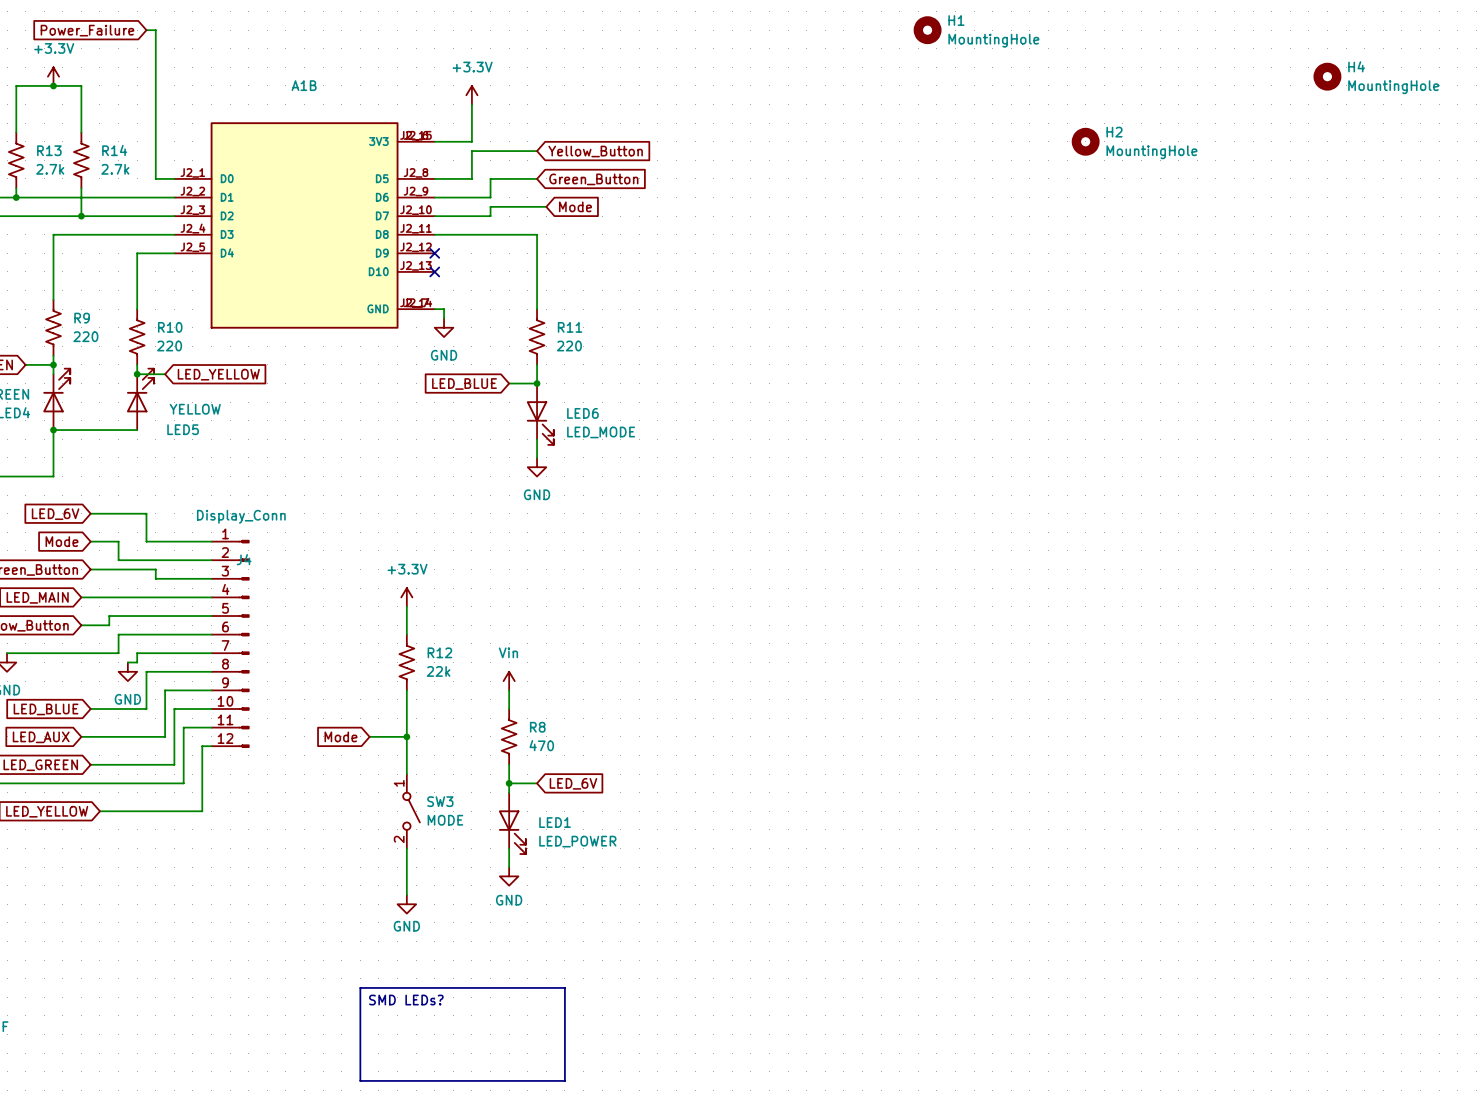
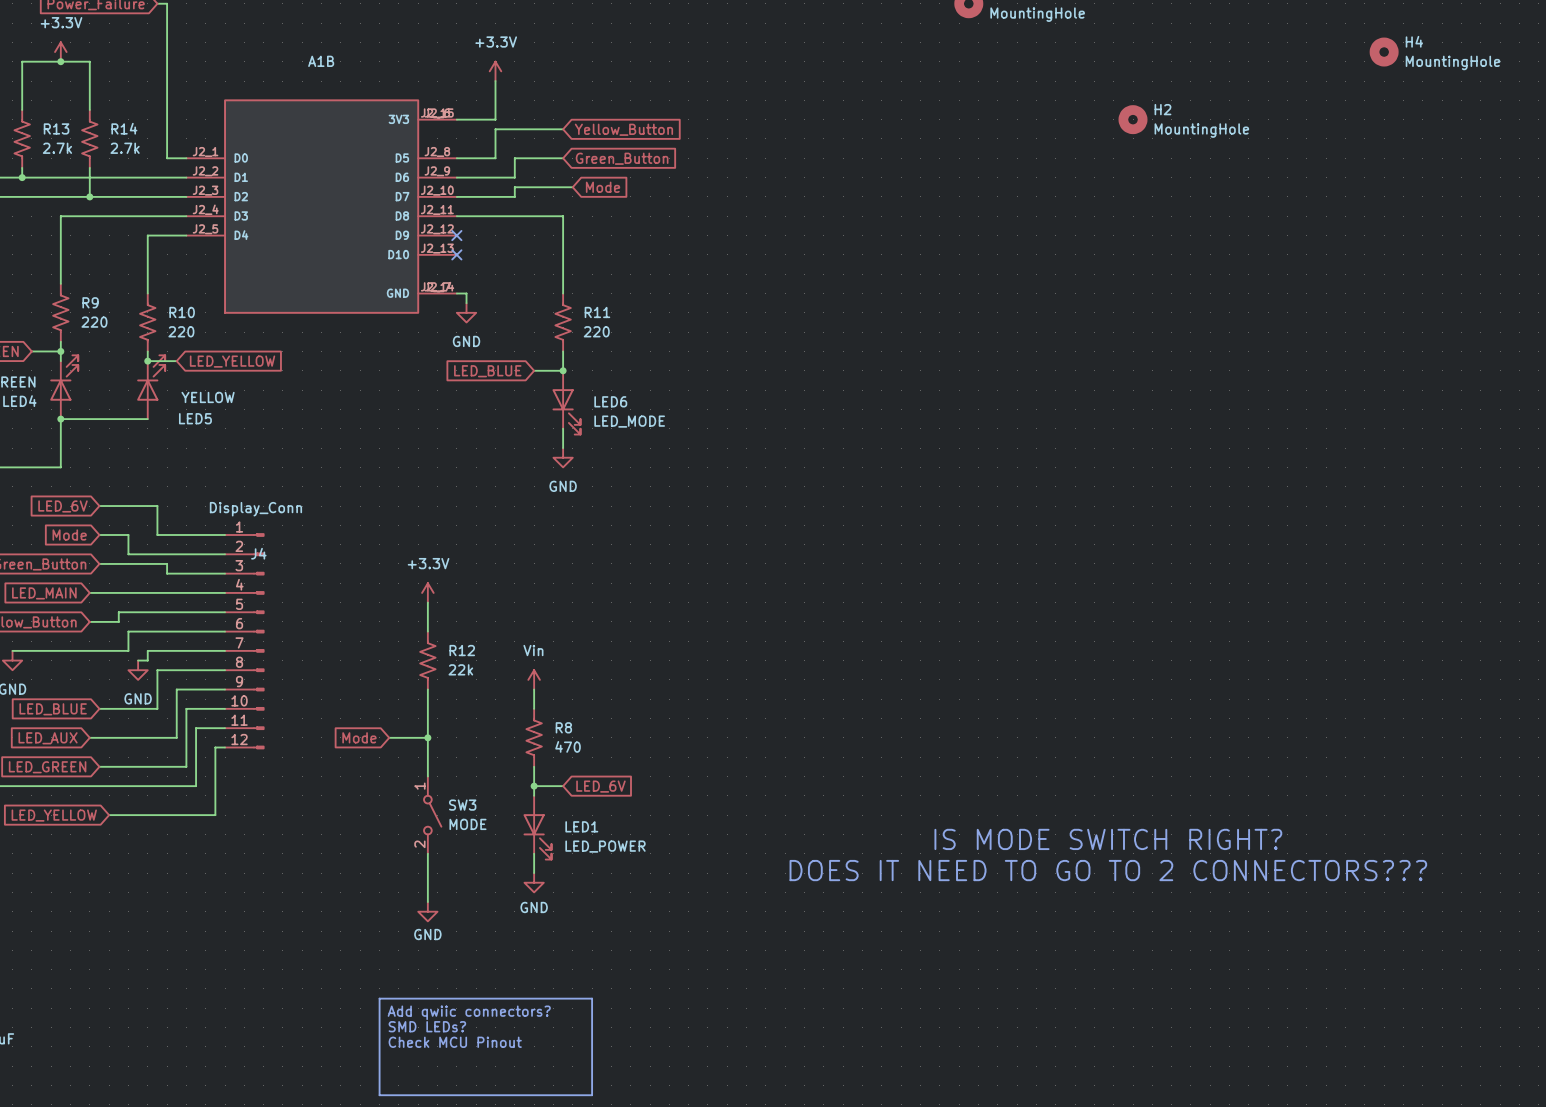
text: none -> IS MODE SWITCH RIGHT? (1108, 839)
text: none -> DOES IT NEED TO GO TO 2 CONNECTORS??? (1108, 870)
text: SMD LEDs? (406, 1000) -> Add qwiic connectors? (469, 1012)
text: none -> SMD LEDs? (427, 1026)
text: none -> Check MCU Pinout (455, 1042)

